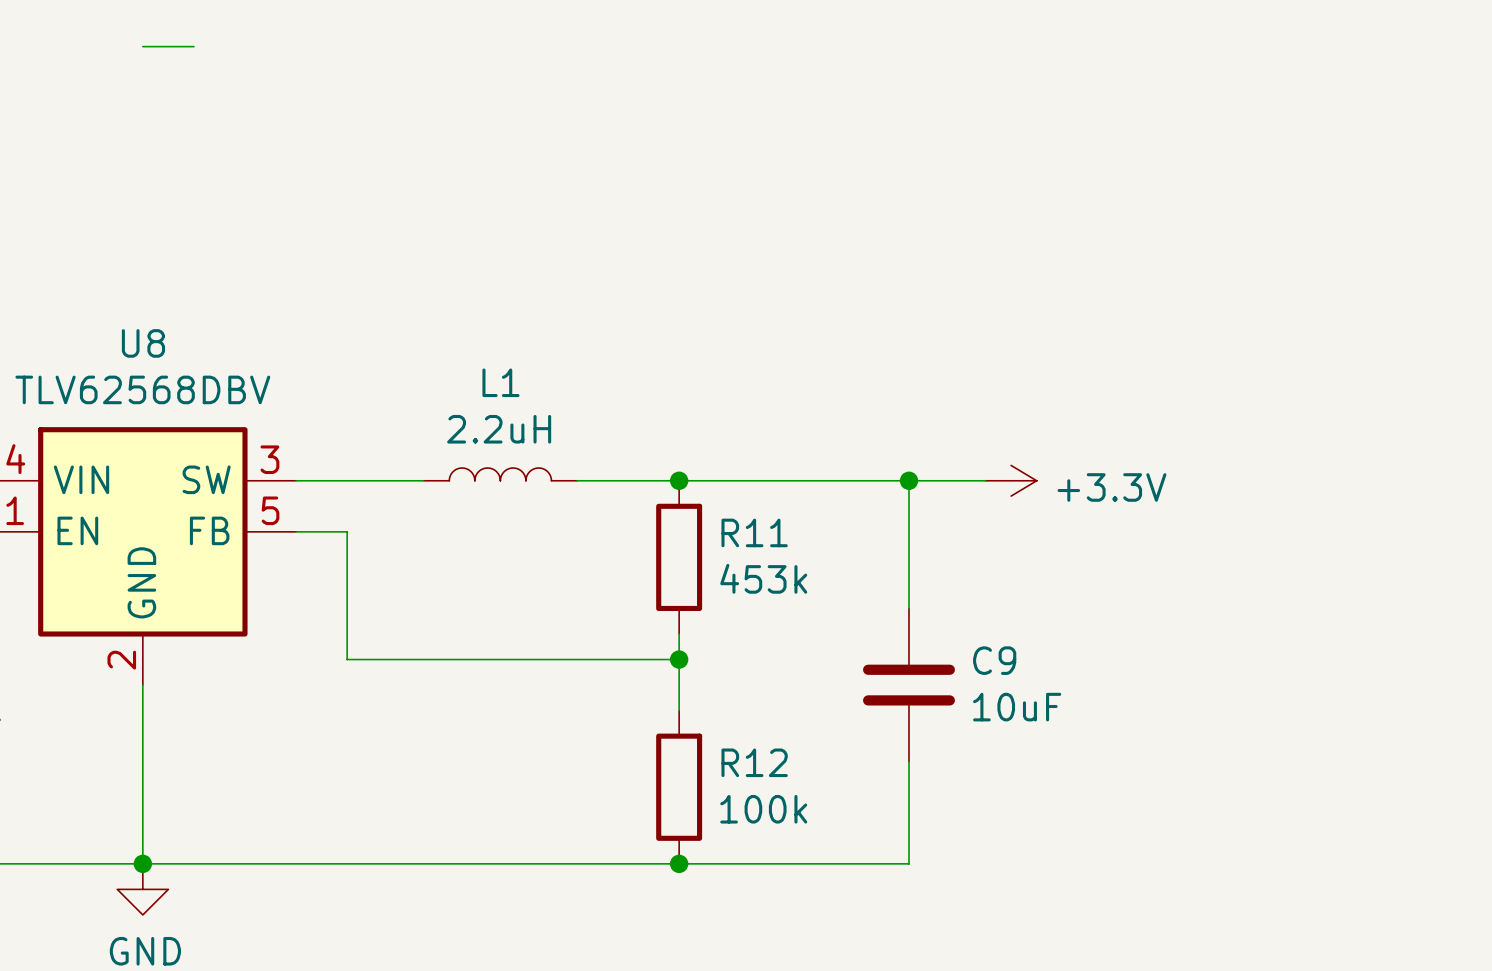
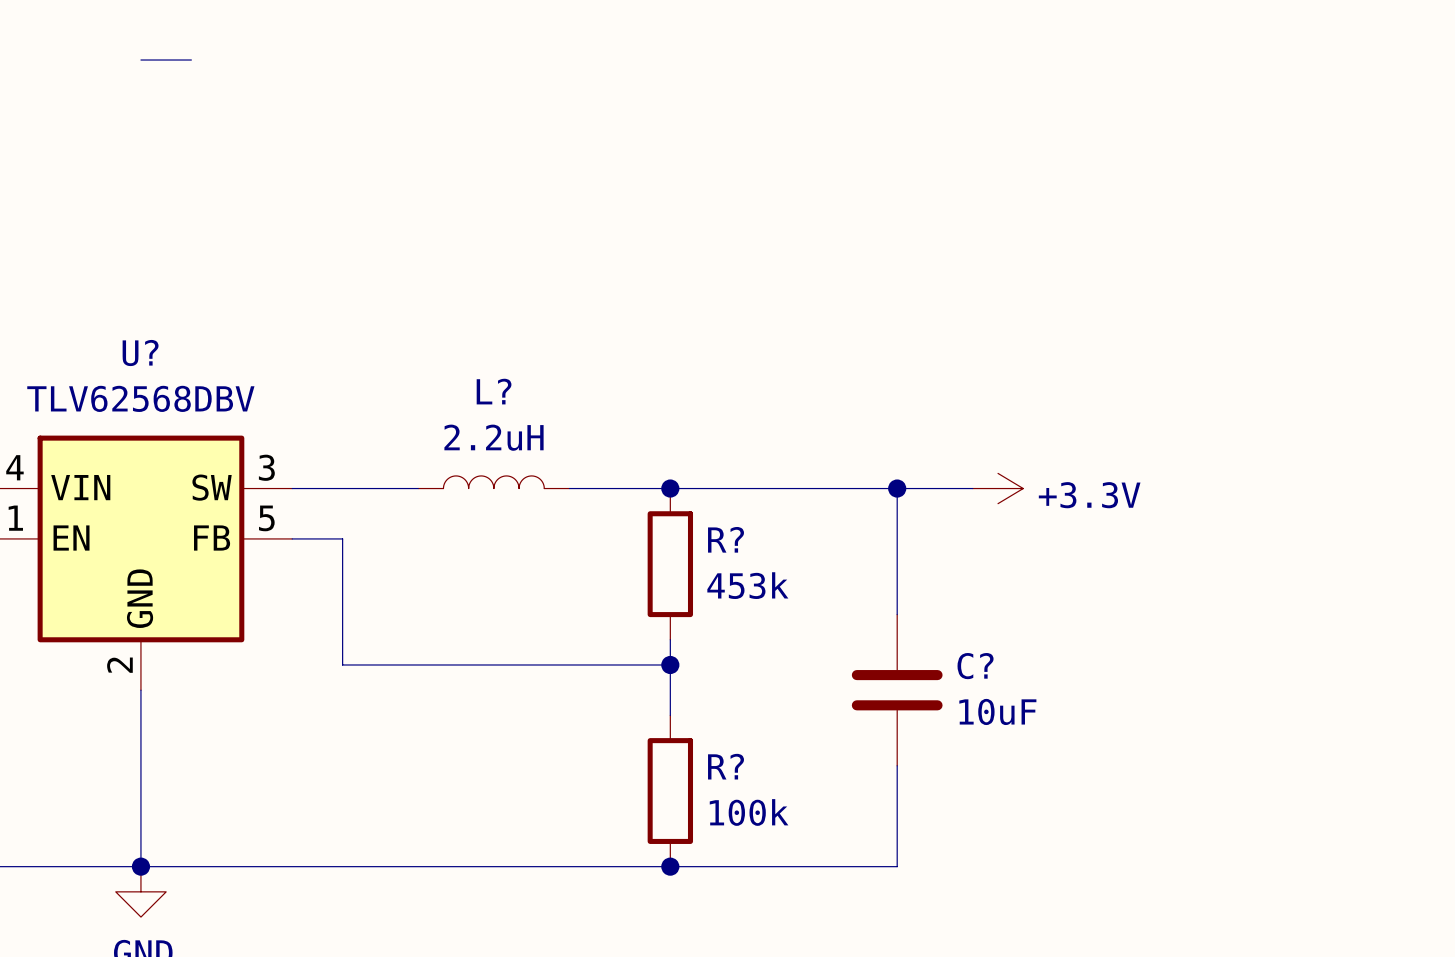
U8 name: U8 (143, 343) -> U? (140, 353)
L1 name: L1 (500, 382) -> L? (494, 391)
R11 name: R11 (754, 532) -> R? (726, 539)
C9 name: C9 (994, 660) -> C? (975, 666)
R12 name: R12 (754, 762) -> R? (726, 766)

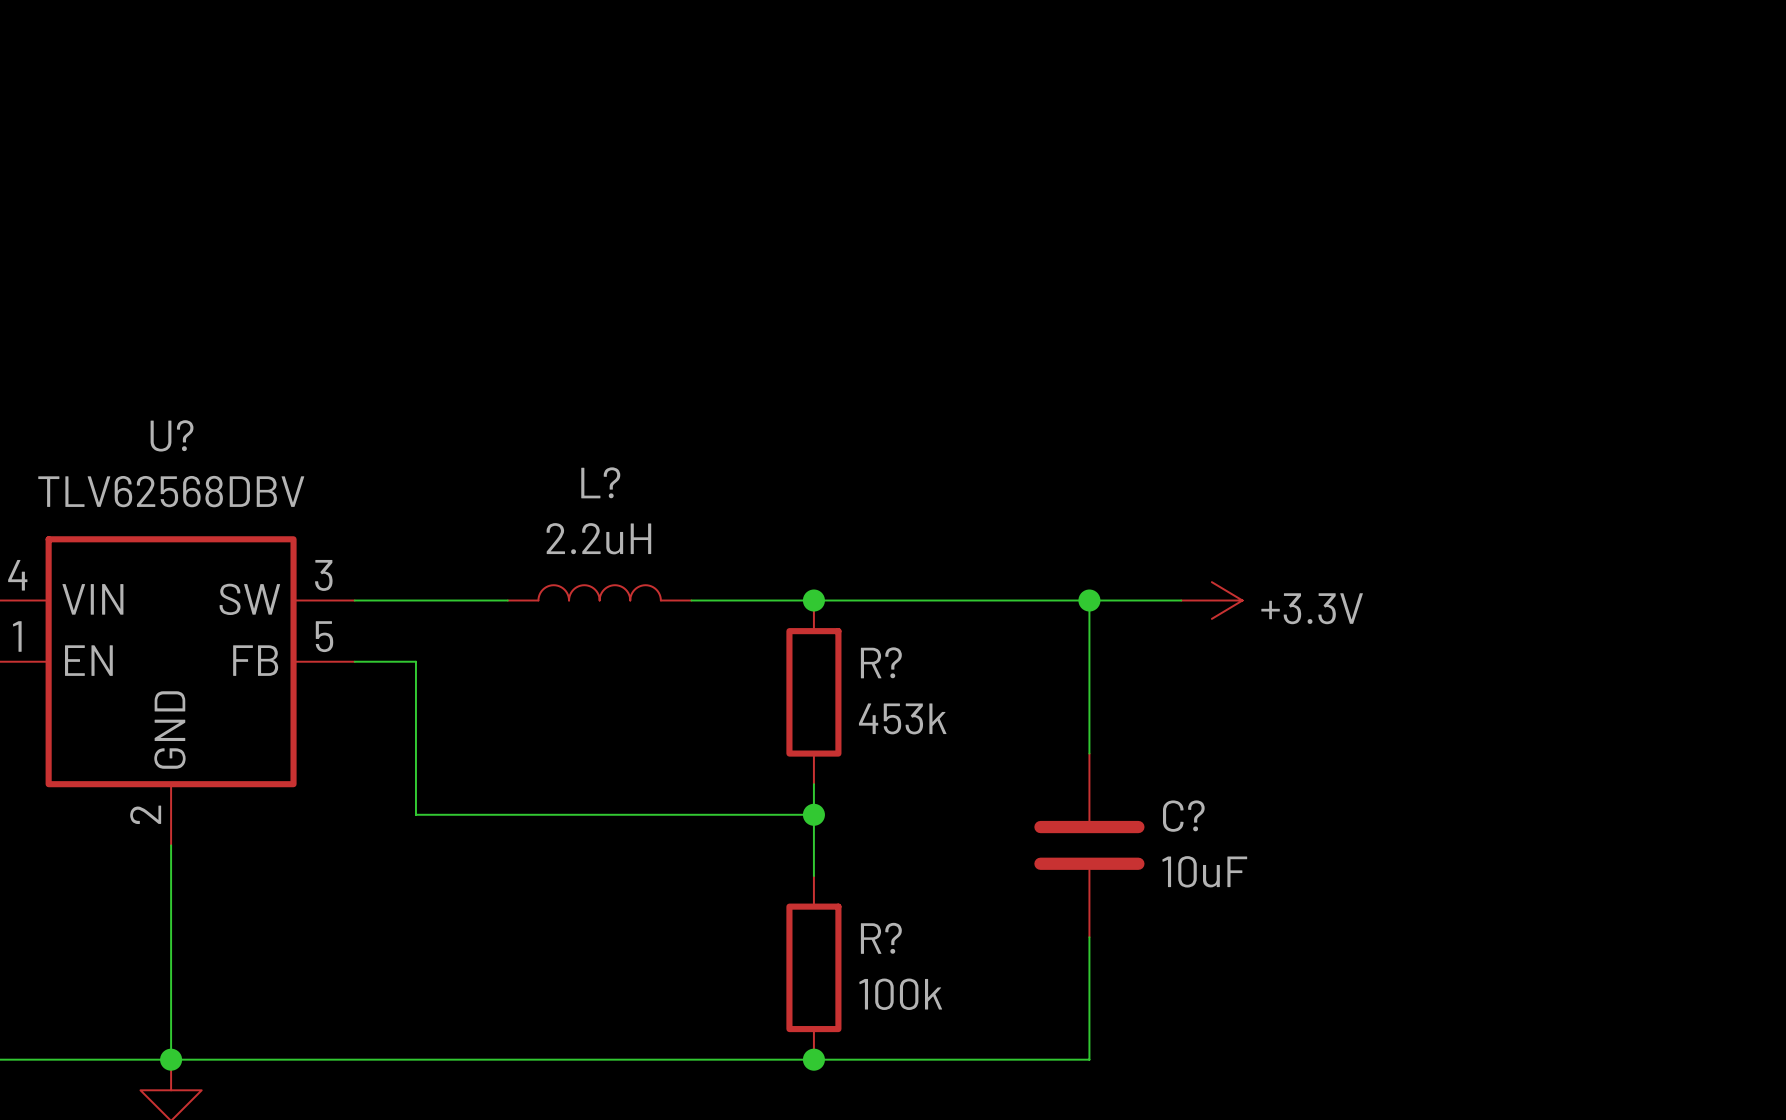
wire: (140, 60) (191, 60) -> none

